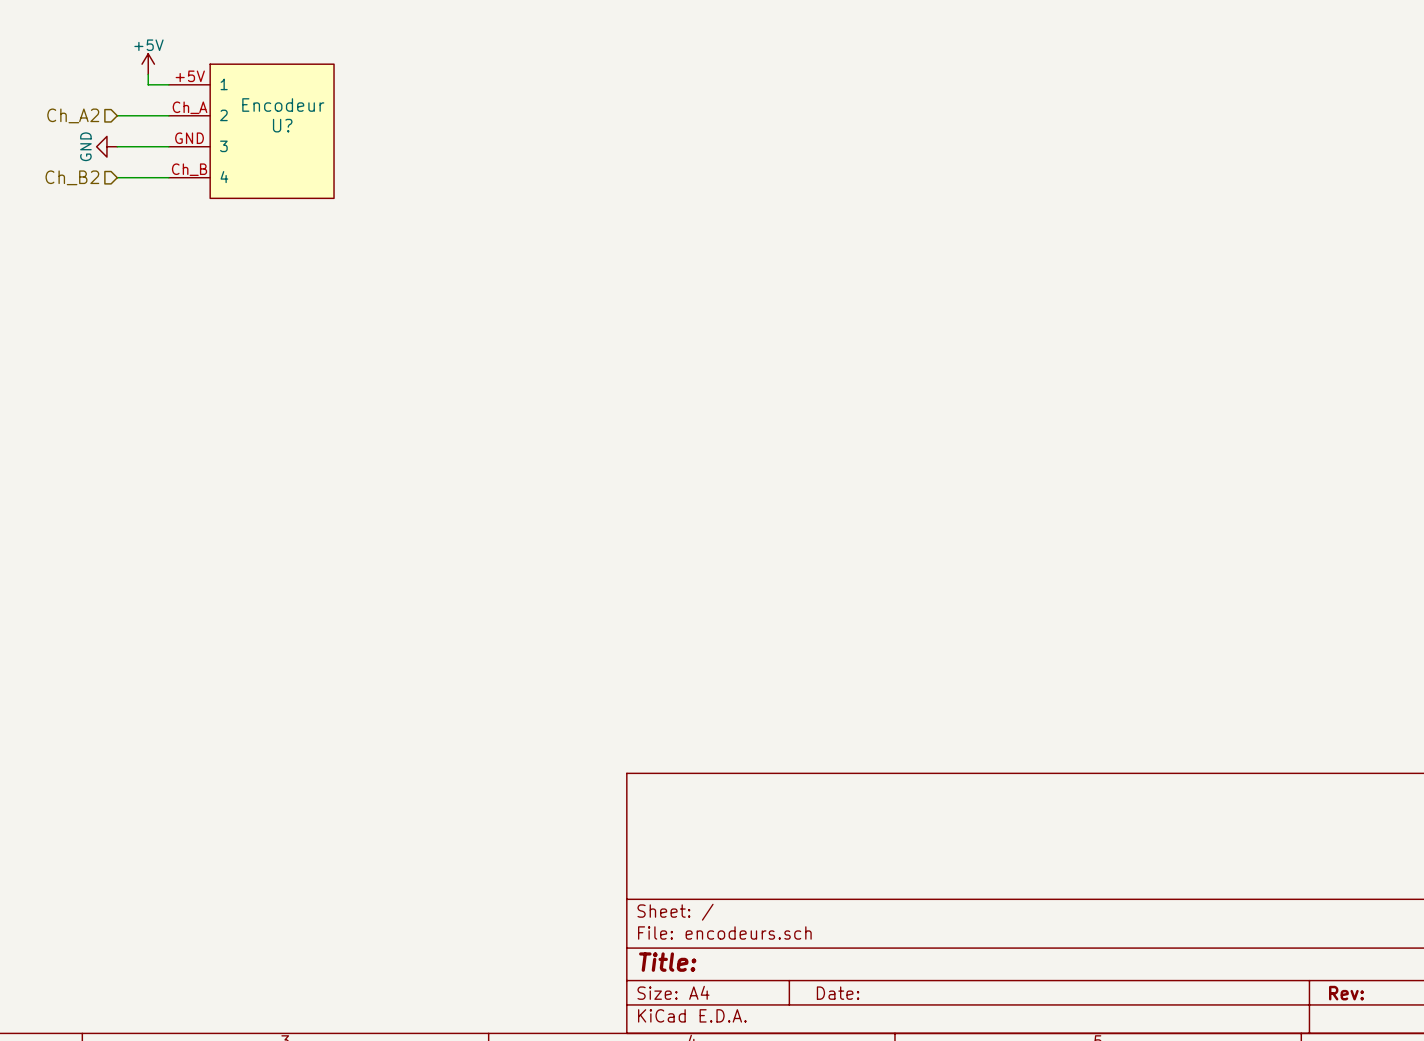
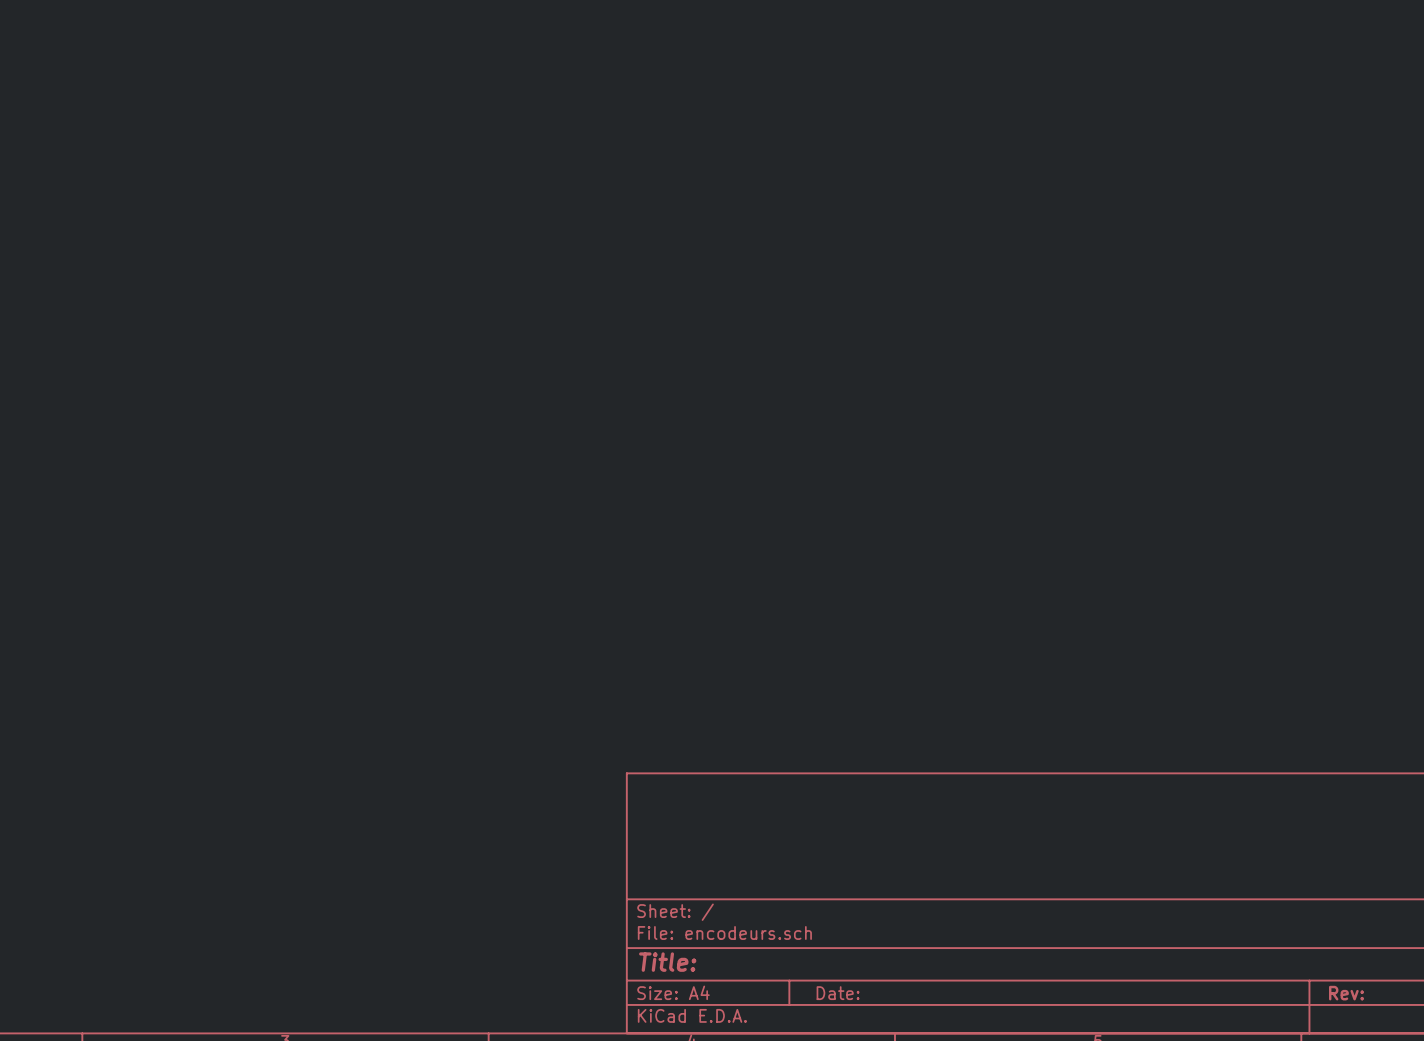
power symbol: +5V (148, 64) -> none
wire: (148, 74) (148, 84) (168, 84) -> none
hierarchical label: Ch_A2 (73, 115) -> none
wire: (117, 115) (168, 115) -> none
U?: Encodeur (251, 131) -> none
power symbol: GND (106, 146) -> none
wire: (117, 146) (168, 146) -> none
hierarchical label: Ch_B2 (72, 177) -> none
wire: (117, 177) (168, 177) -> none

